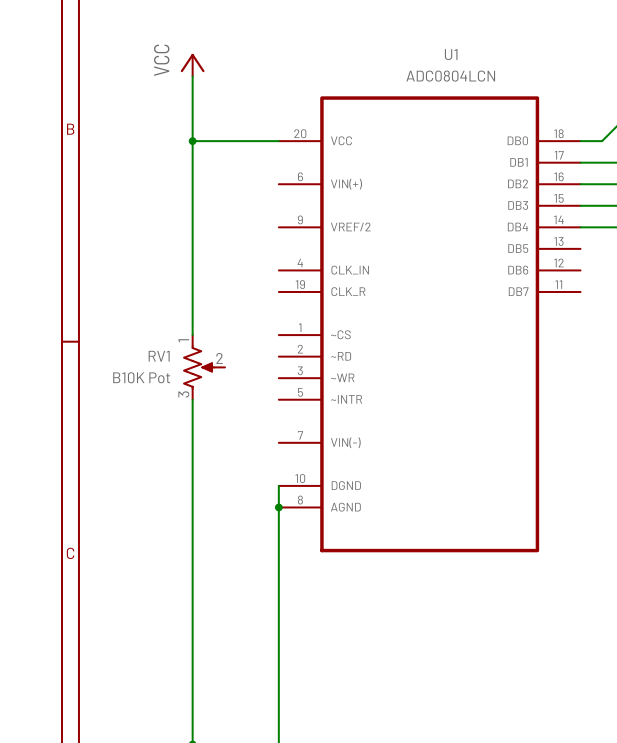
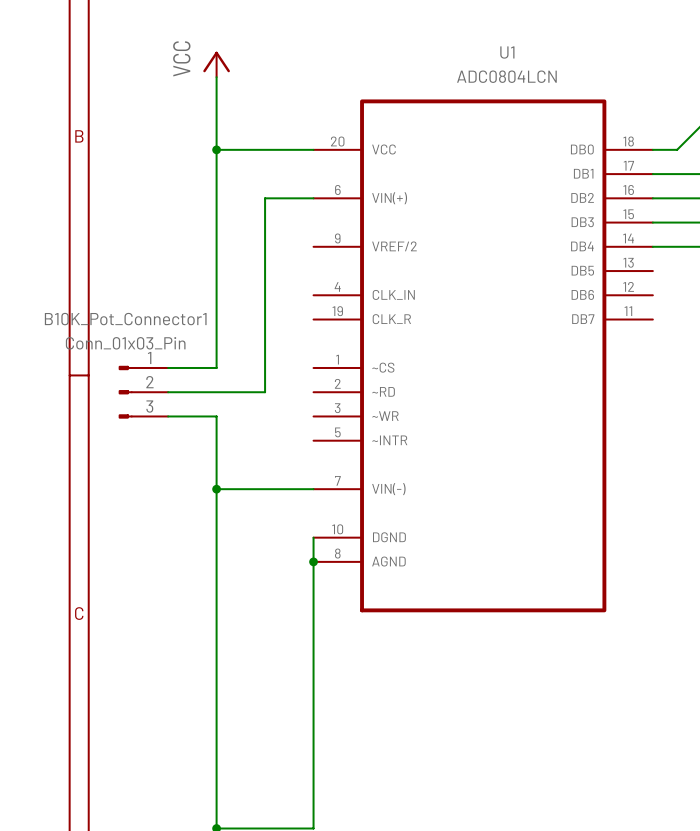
wire: none -> (313, 198) (265, 198) (265, 392) (168, 392)
wire: none -> (168, 367) (216, 367)
B10K_Pot_Connector1: none -> Conn_01x03_Pin (143, 392)
RV1: B10K Pot (204, 367) -> none
wire: none -> (168, 416) (216, 416) (216, 440)
wire: none -> (216, 489) (313, 489)
junction: none -> (216, 489)

